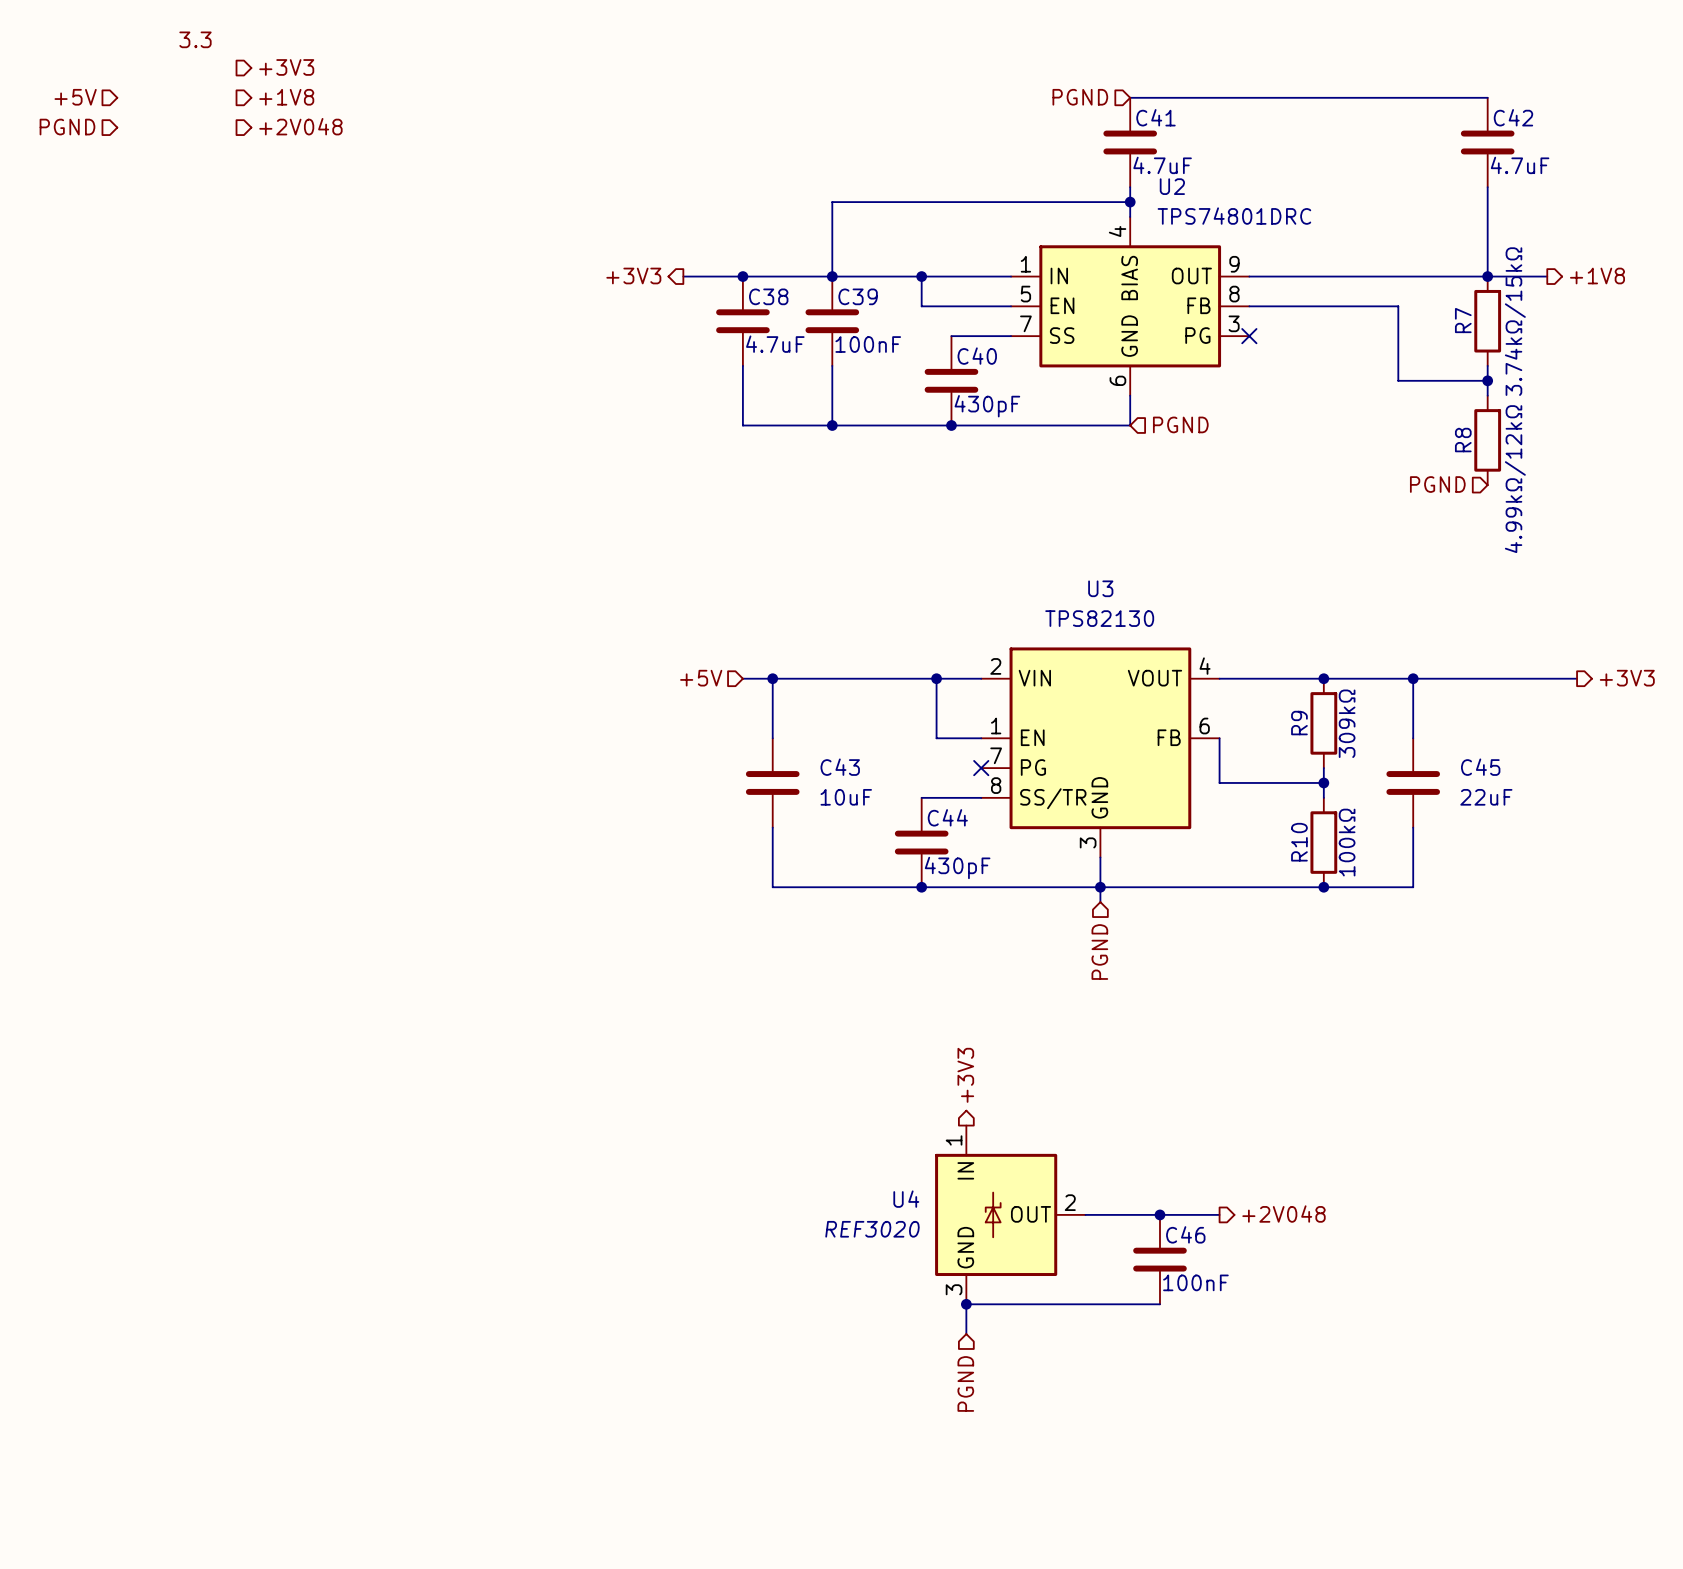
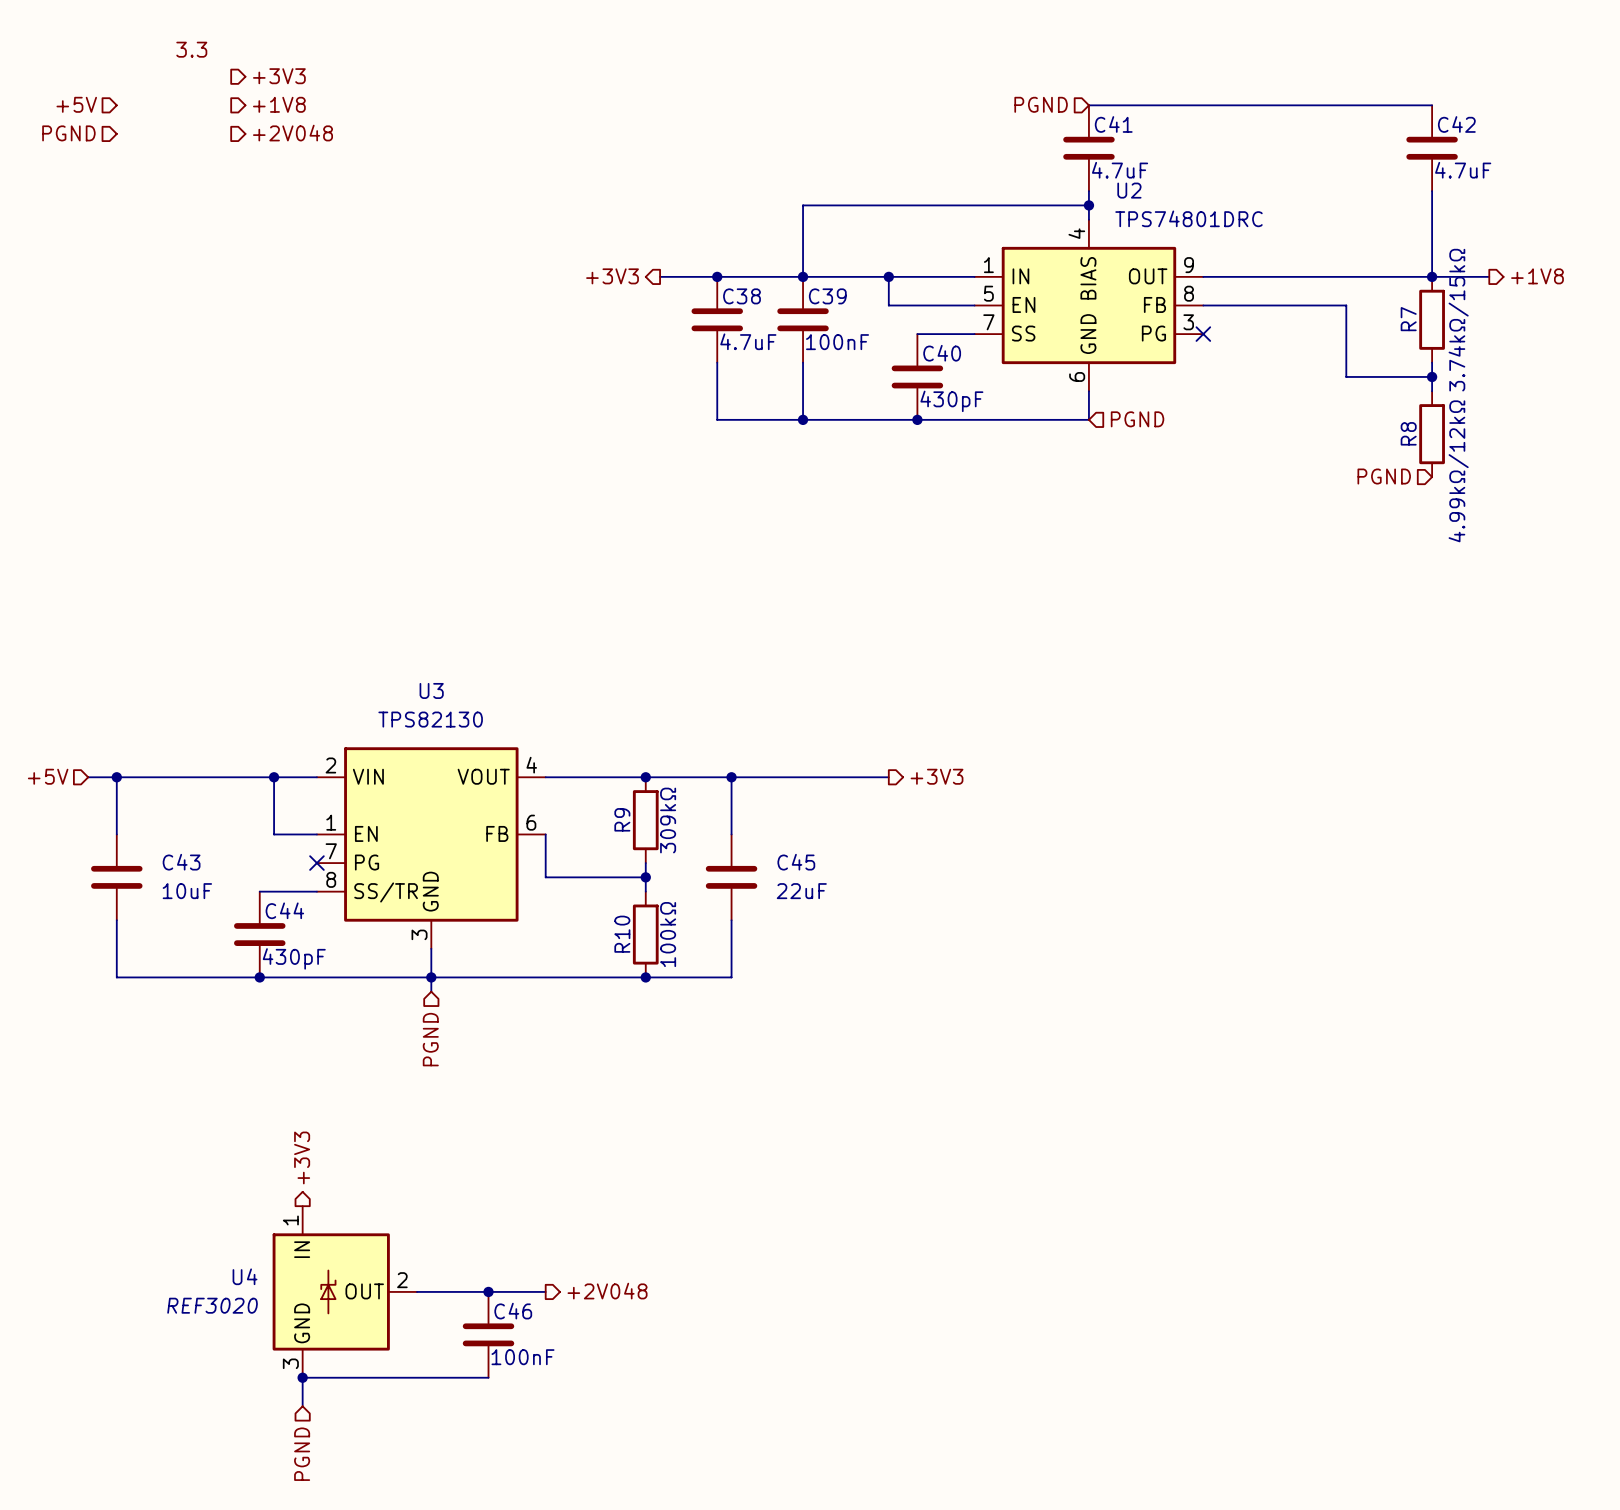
hierarchical label: +5V (701, 678) -> none
wire: (742, 678) (981, 678) -> none
wire: (772, 678) (772, 738) -> (731, 777) (731, 834)
junction: (772, 678) -> none
wire: (936, 678) (936, 738) (981, 738) -> none
junction: (936, 678) -> none
wire: (1219, 678) (1577, 678) -> none
junction: (1323, 678) -> none
wire: (1413, 678) (1413, 738) -> none
junction: (1413, 678) -> none
hierarchical label: +3V3 (1627, 678) -> none
R9 position: (1323, 723) -> (645, 820)
wire: (1219, 738) (1219, 782) (1323, 782) -> none
U3 position: (1100, 752) -> (431, 848)
no-connect mark: (981, 768) -> none
wire: (1323, 768) (1323, 797) -> none
C43 position: (772, 782) -> (116, 877)
junction: (1323, 782) -> none
C45 position: (1413, 782) -> (731, 877)
hierarchical label: none -> +5V (48, 776)
wire: none -> (88, 777) (316, 777)
wire: none -> (116, 777) (116, 834)
junction: none -> (116, 777)
wire: none -> (274, 777) (274, 834) (316, 834)
junction: none -> (274, 777)
junction: none -> (645, 777)
junction: none -> (731, 777)
wire: (921, 797) (981, 797) -> (888, 777) (545, 777)
hierarchical label: none -> +3V3 (937, 776)
wire: (772, 827) (772, 887) (1413, 887) (1413, 827) -> none
C44 position: (921, 842) -> (259, 934)
R10 position: (1323, 842) -> (645, 934)
wire: none -> (545, 834) (545, 877) (645, 877)
wire: (1100, 857) (1100, 902) -> none
no-connect mark: none -> (316, 863)
wire: none -> (645, 863) (645, 891)
junction: (921, 887) -> none
junction: (1100, 887) -> none
junction: (1323, 887) -> none
junction: none -> (645, 877)
wire: none -> (259, 891) (316, 891)
wire: none -> (116, 920) (116, 977) (731, 977) (731, 920)
hierarchical label: PGND (1099, 952) -> none
wire: none -> (431, 948) (431, 991)
junction: none -> (259, 977)
junction: none -> (431, 977)
junction: none -> (645, 977)
hierarchical label: none -> PGND (430, 1039)
hierarchical label: +3V3 (965, 1075) -> none
hierarchical label: none -> +3V3 (302, 1157)
U4 position: (1010, 1214) -> (344, 1291)
wire: (1085, 1214) (1219, 1214) -> none
junction: (1159, 1214) -> none
hierarchical label: +2V048 (1283, 1214) -> none
C46 position: (1159, 1259) -> (488, 1334)
junction: (966, 1304) -> none
wire: (1159, 1304) (966, 1304) (966, 1334) -> none
hierarchical label: none -> +2V048 (607, 1291)
wire: none -> (417, 1291) (545, 1291)
junction: none -> (488, 1291)
hierarchical label: PGND (965, 1383) -> none
junction: none -> (302, 1377)
wire: none -> (488, 1377) (302, 1377) (302, 1406)
hierarchical label: none -> PGND (302, 1454)

